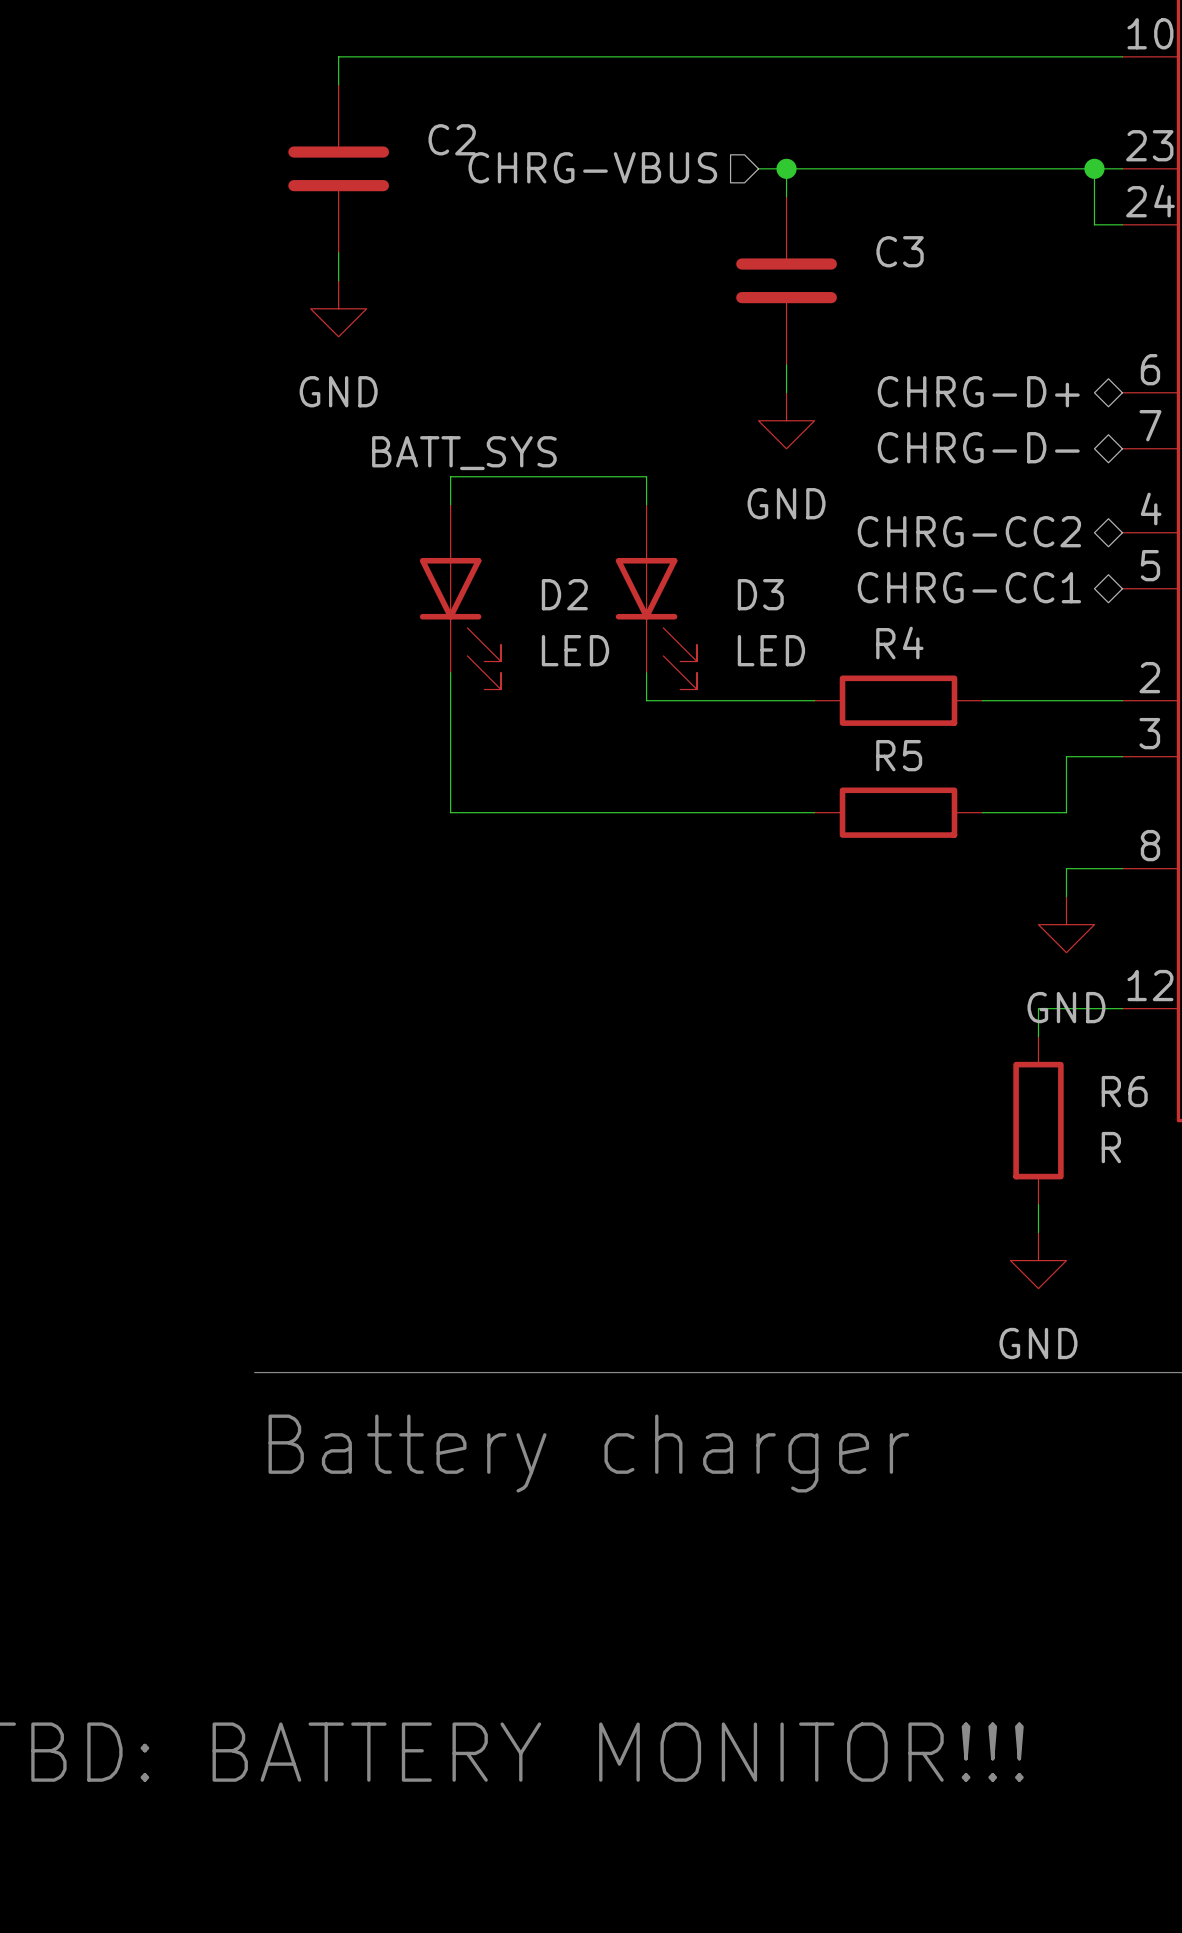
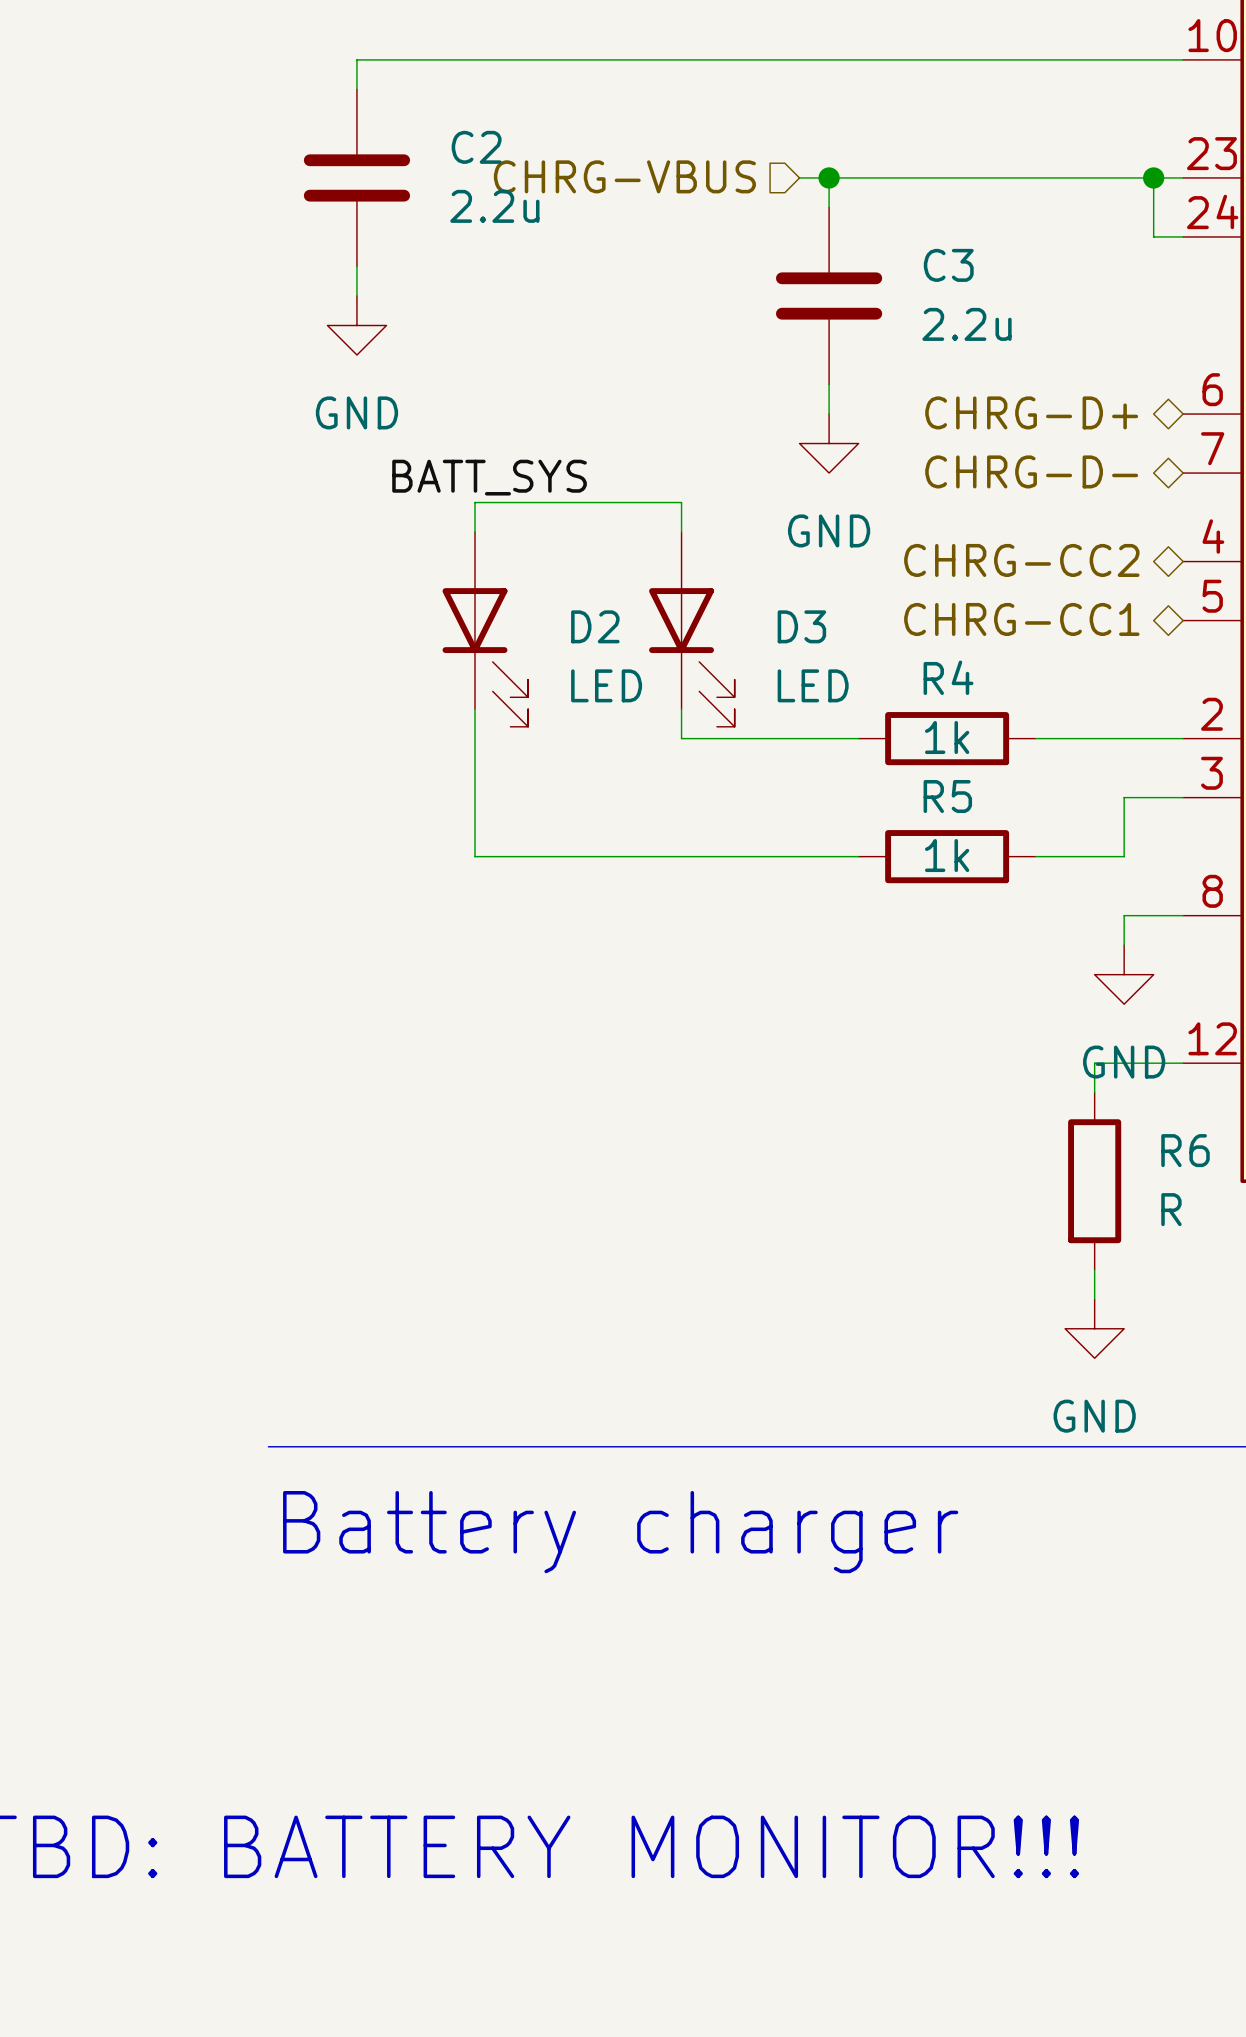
C2 value: none -> 2.2u (494, 206)
C3 value: none -> 2.2u (967, 324)
R4 value: none -> 1k (947, 737)
R5 value: none -> 1k (947, 855)

